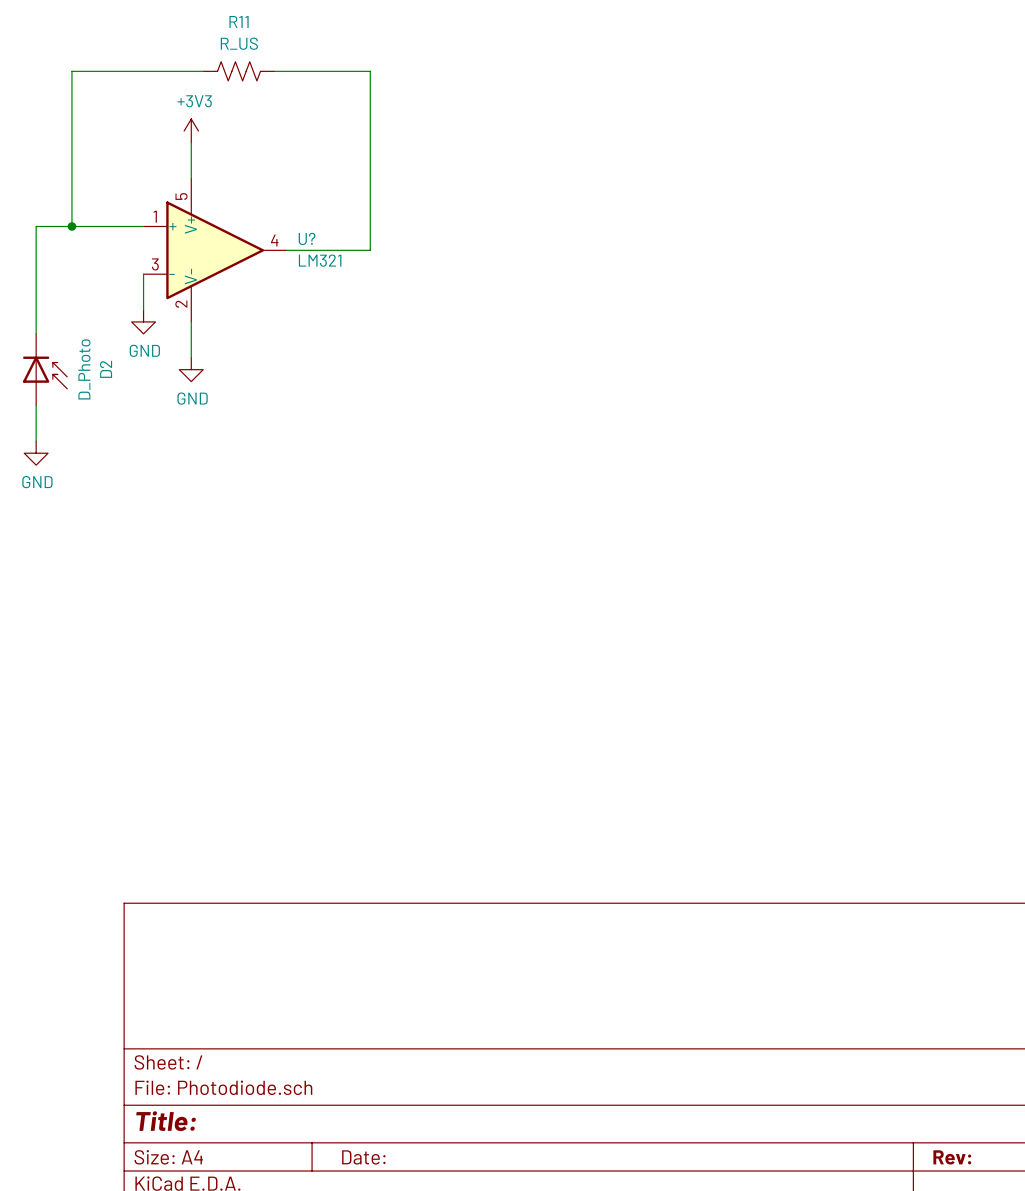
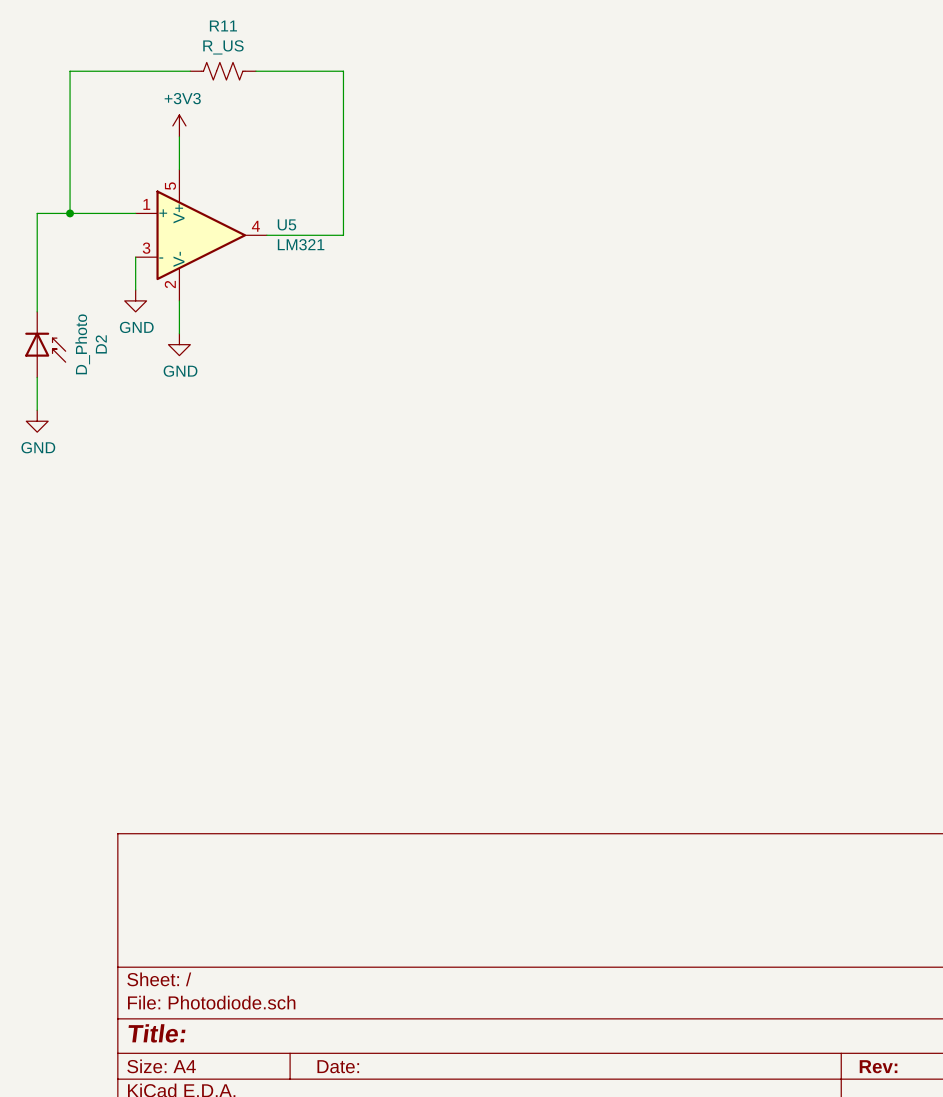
U? name: U? (307, 238) -> U5 (286, 224)

